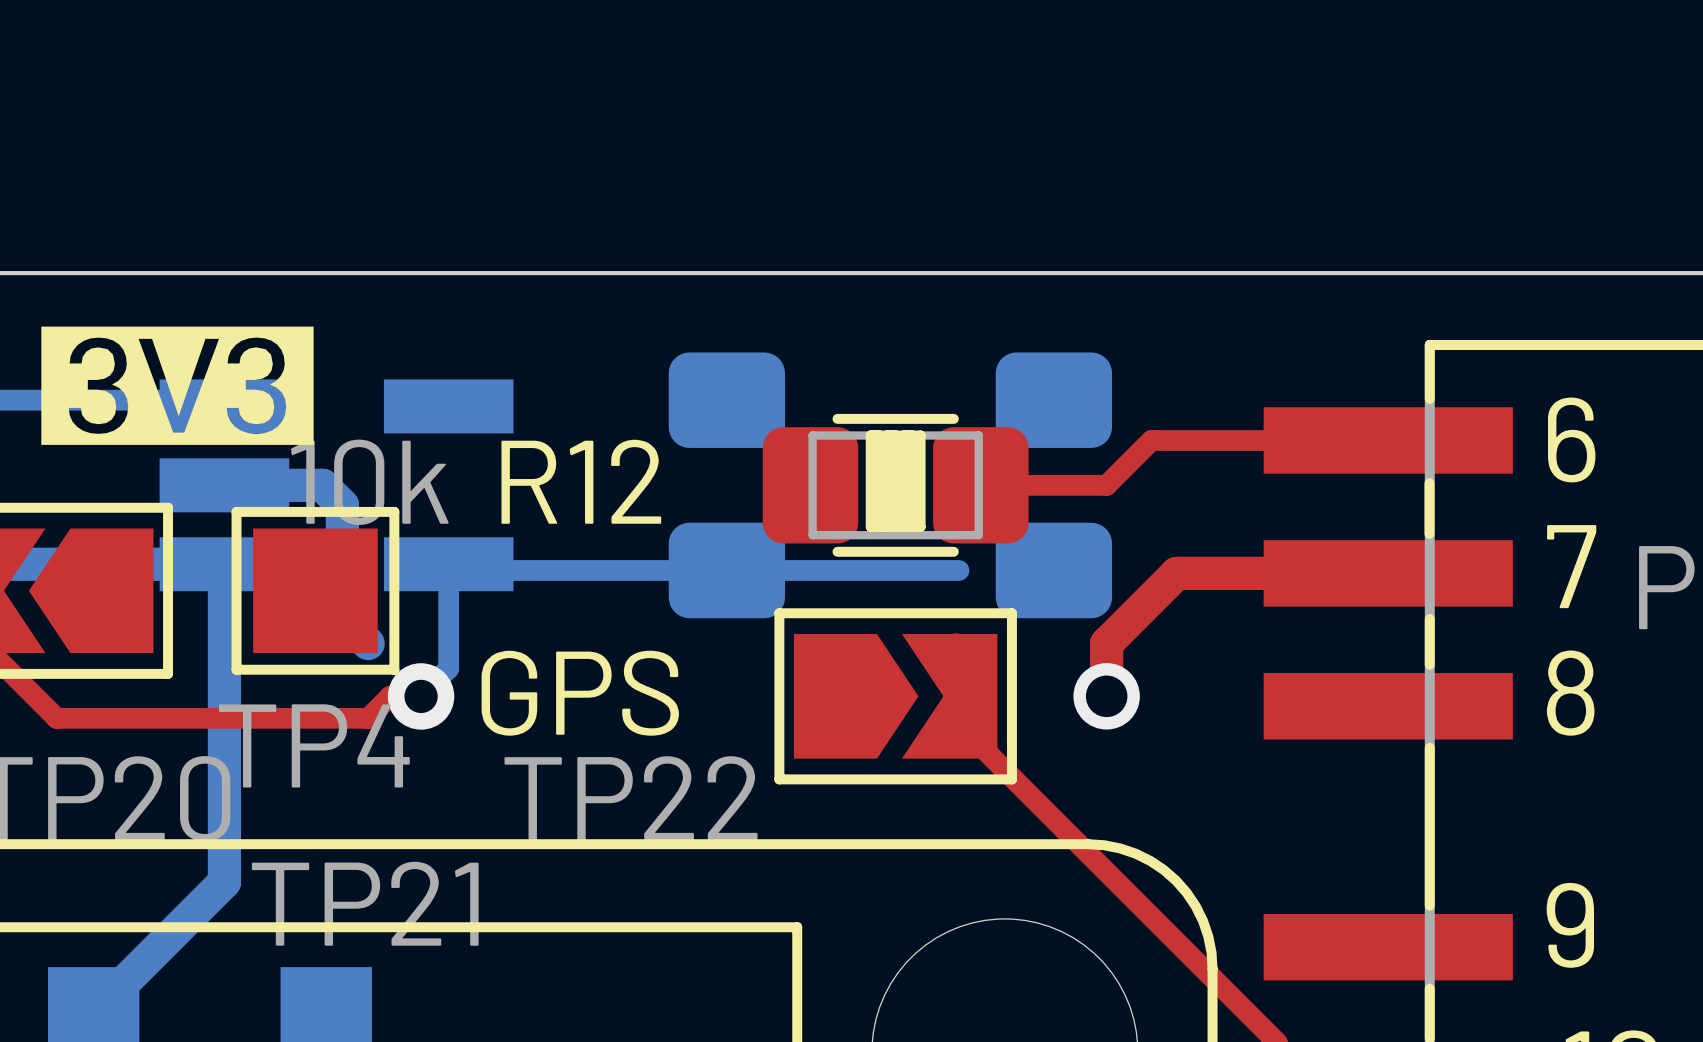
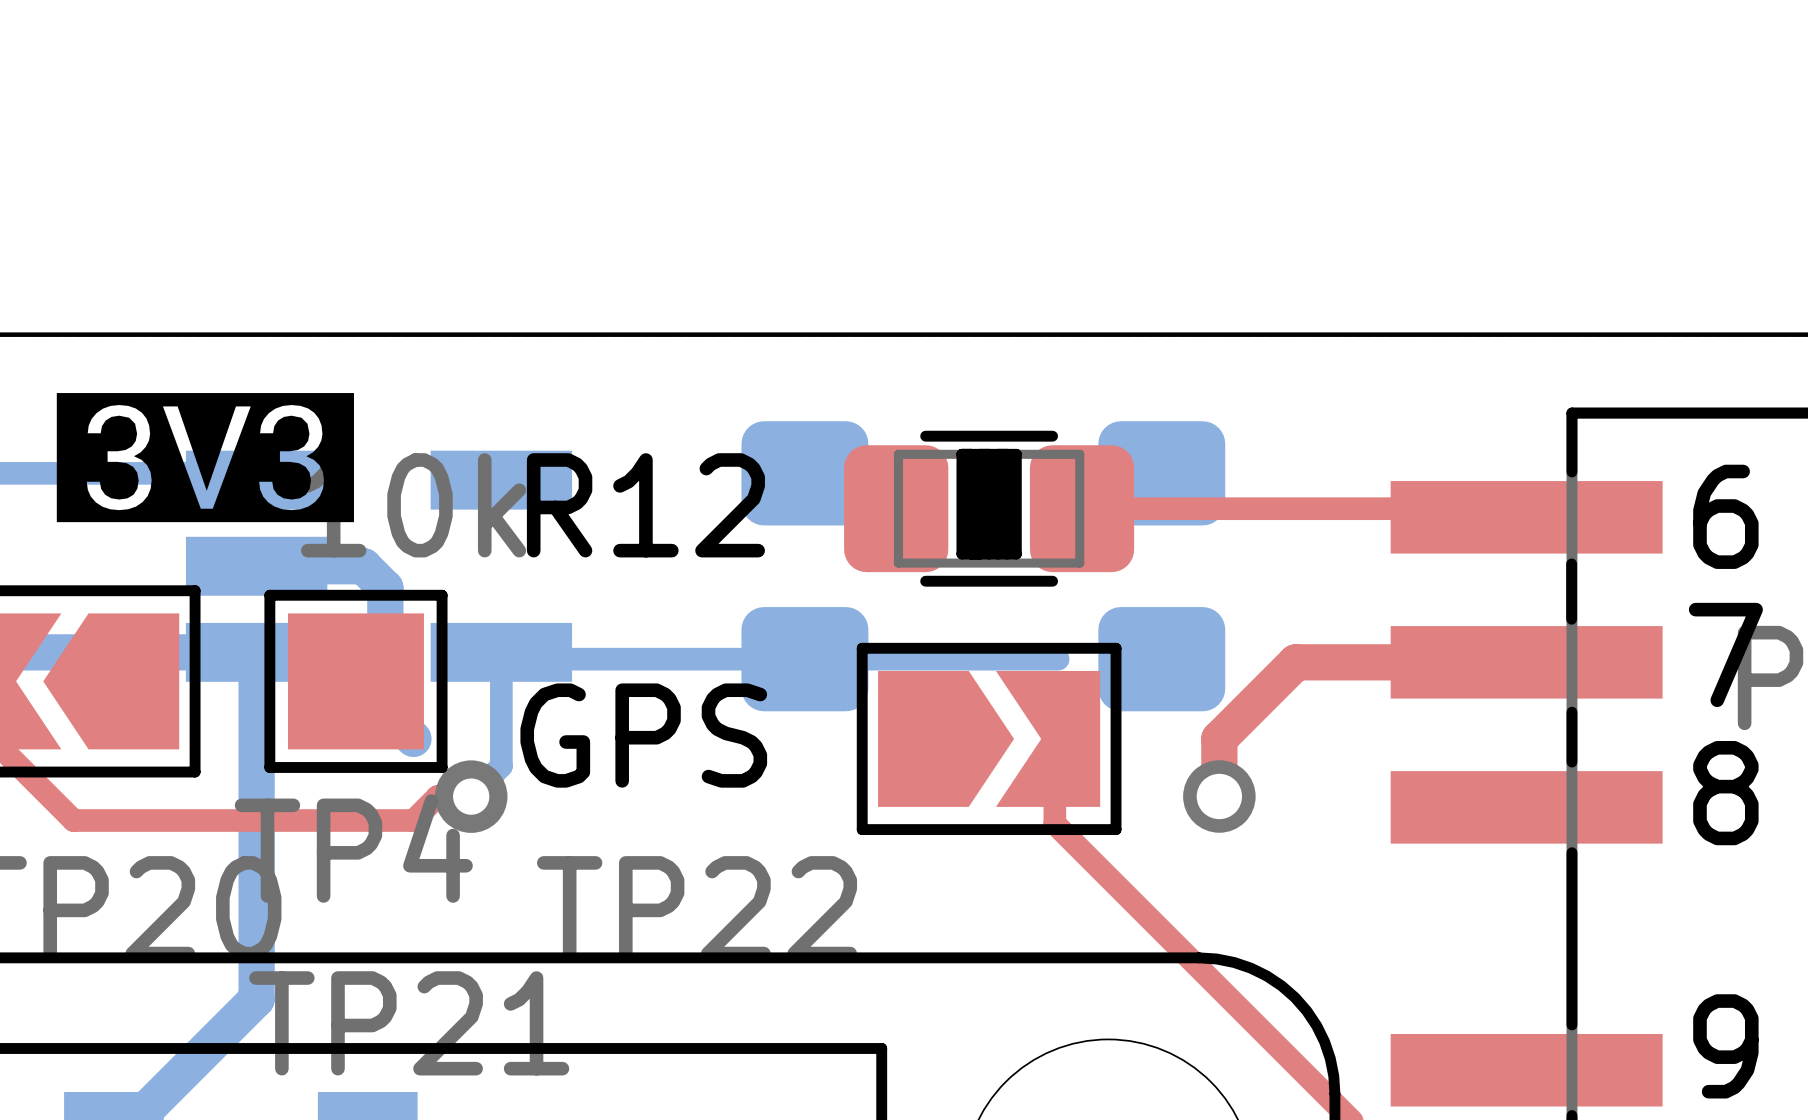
top track: none -> (1082, 508) (1518, 508)
top track: (1388, 440) (1151, 440) (1106, 485) (980, 485) -> none
R12 position: (895, 485) -> (989, 508)
text position: GPS (580, 693) -> GPS (643, 735)
part position: (895, 696) -> (989, 738)

